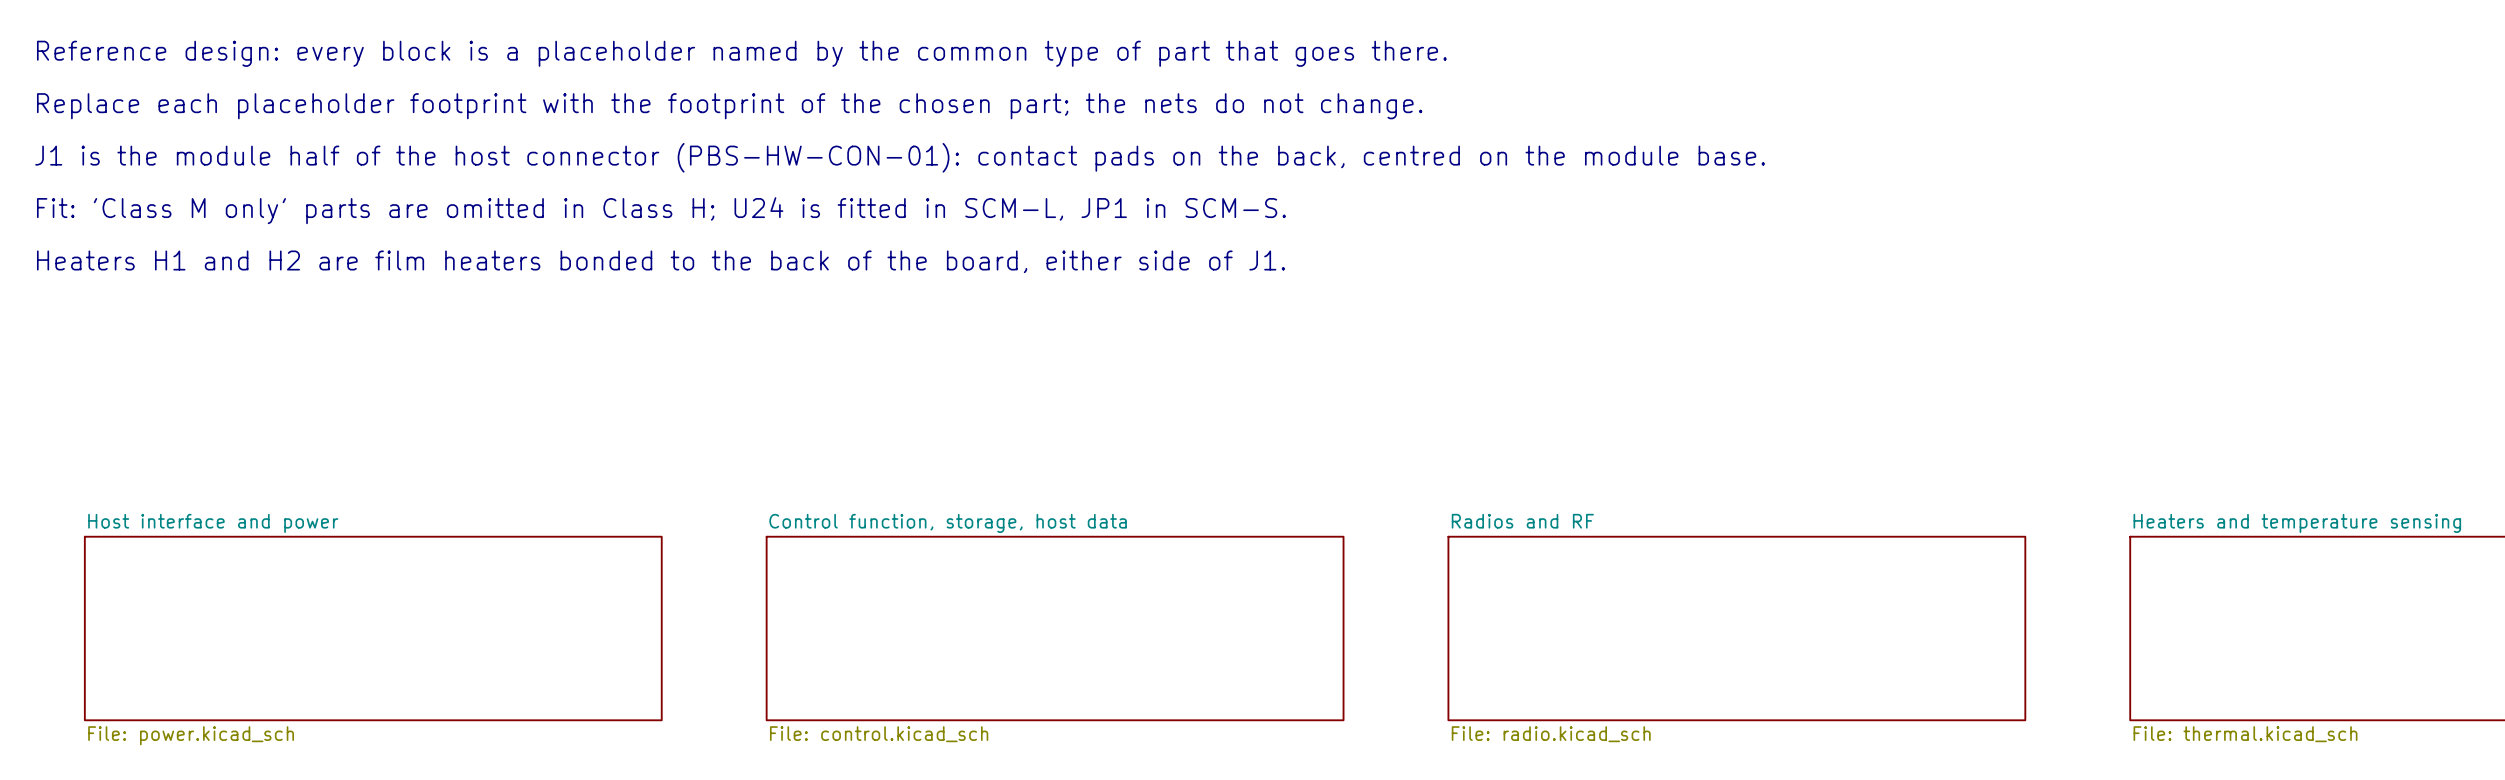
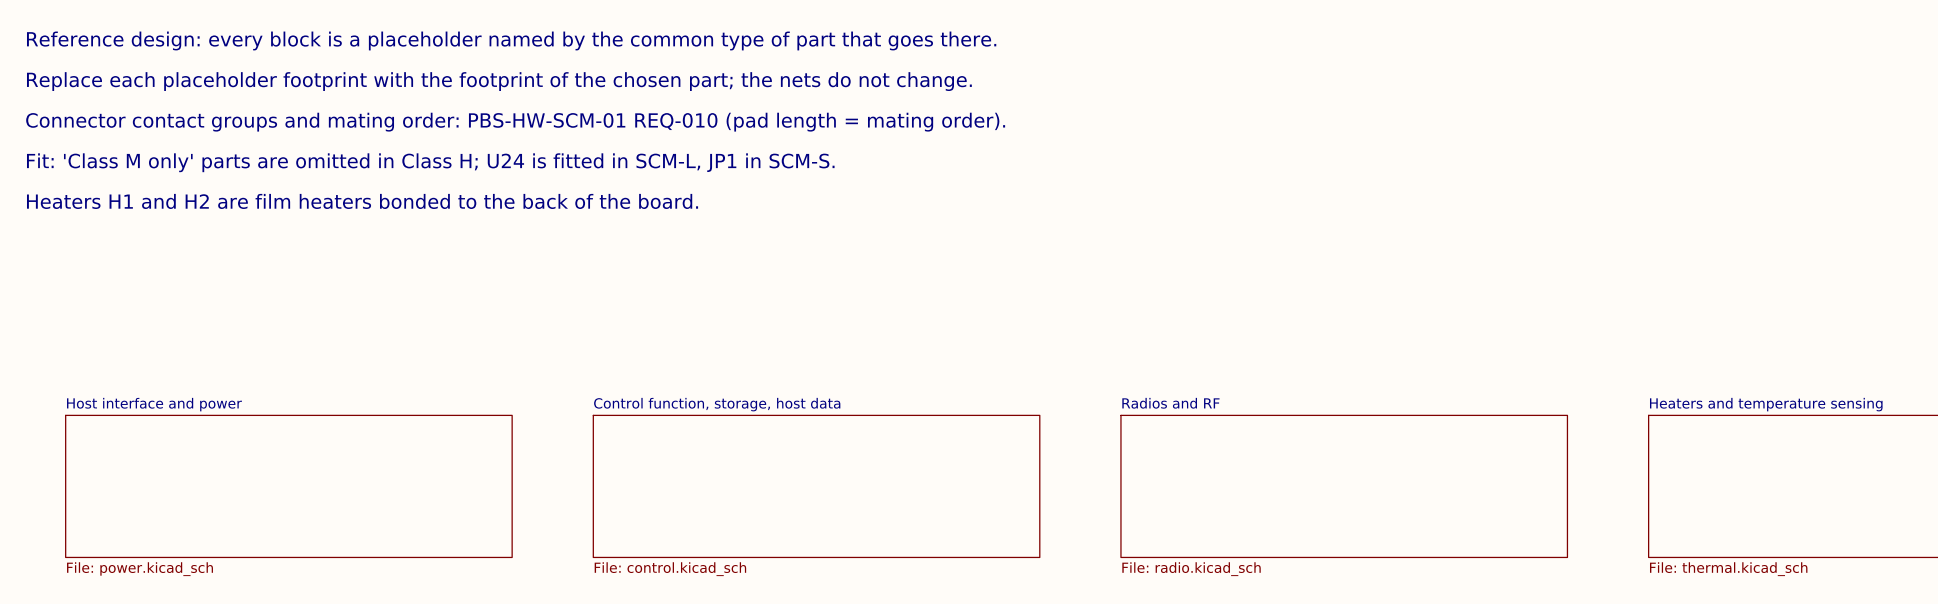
text: J1 is the module half of the host connector (PBS-HW-CON-01): contact pads on the back, centred on the module base. (900, 157) -> Connector contact groups and mating order: PBS-HW-SCM-01 REQ-010 (pad length = mating order). (515, 122)
text: Heaters H1 and H2 are film heaters bonded to the back of the board, either side of J1. (661, 261) -> Heaters H1 and H2 are film heaters bonded to the back of the board. (362, 201)

